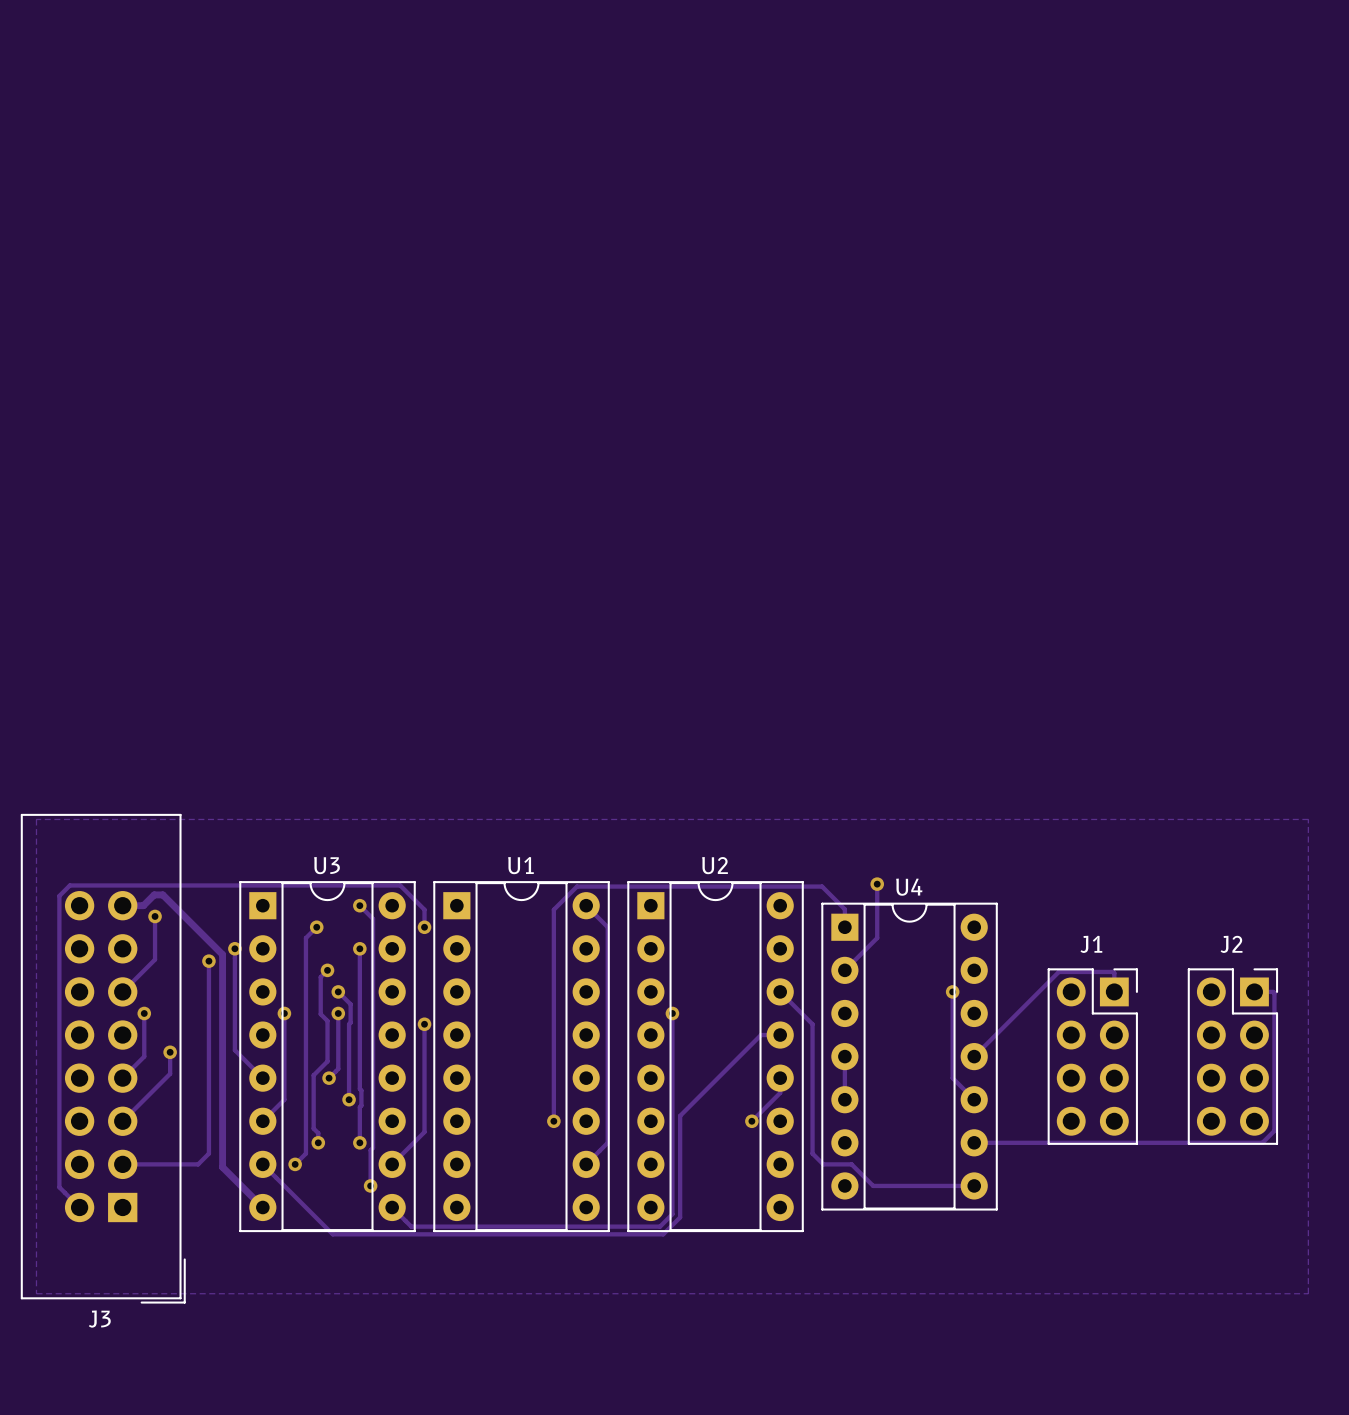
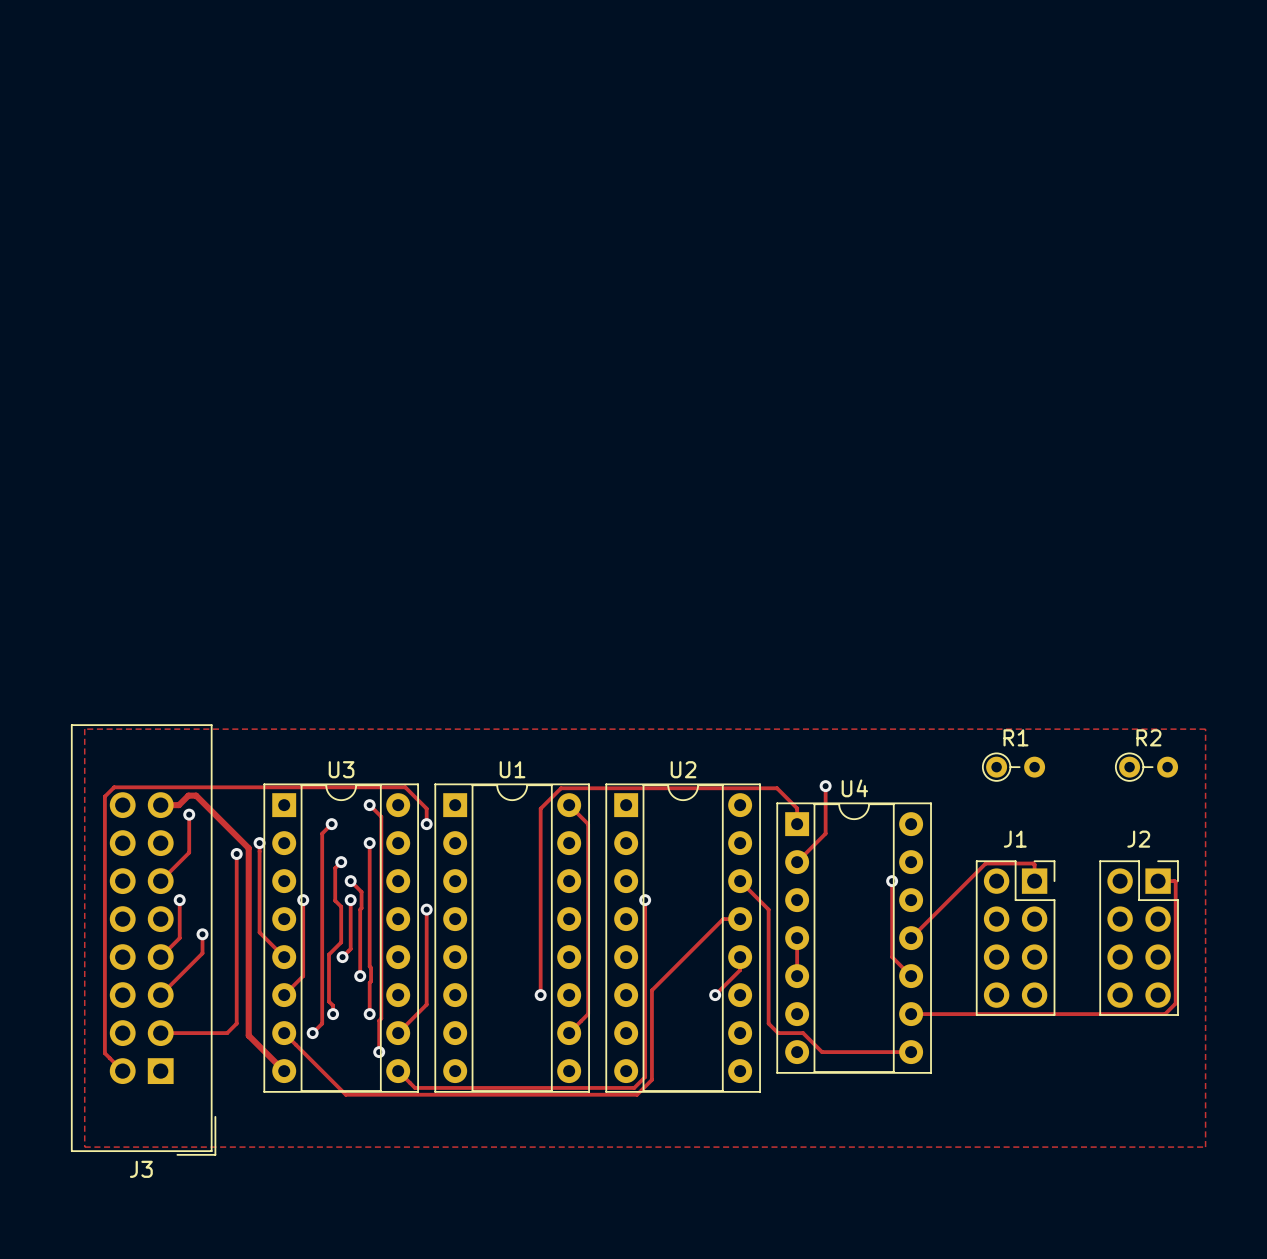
R1: none -> (1013, 767)
R2: none -> (1146, 767)

